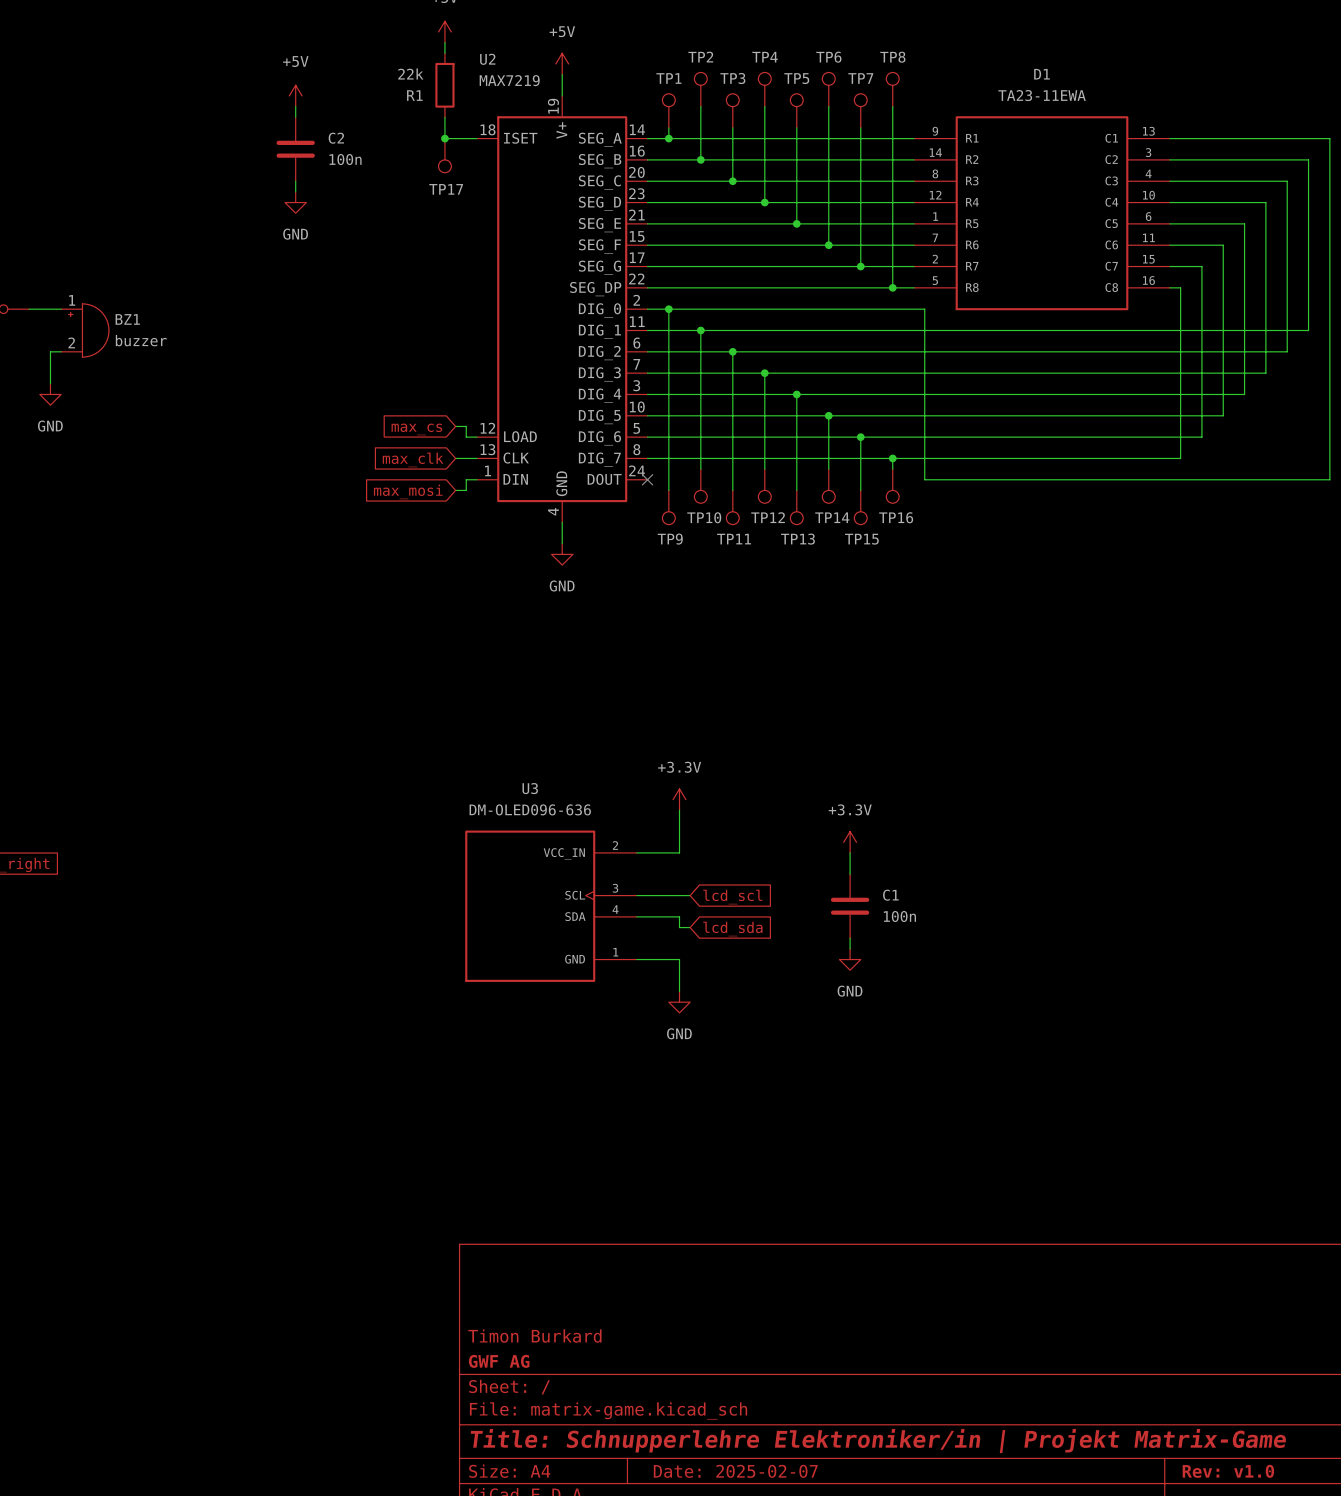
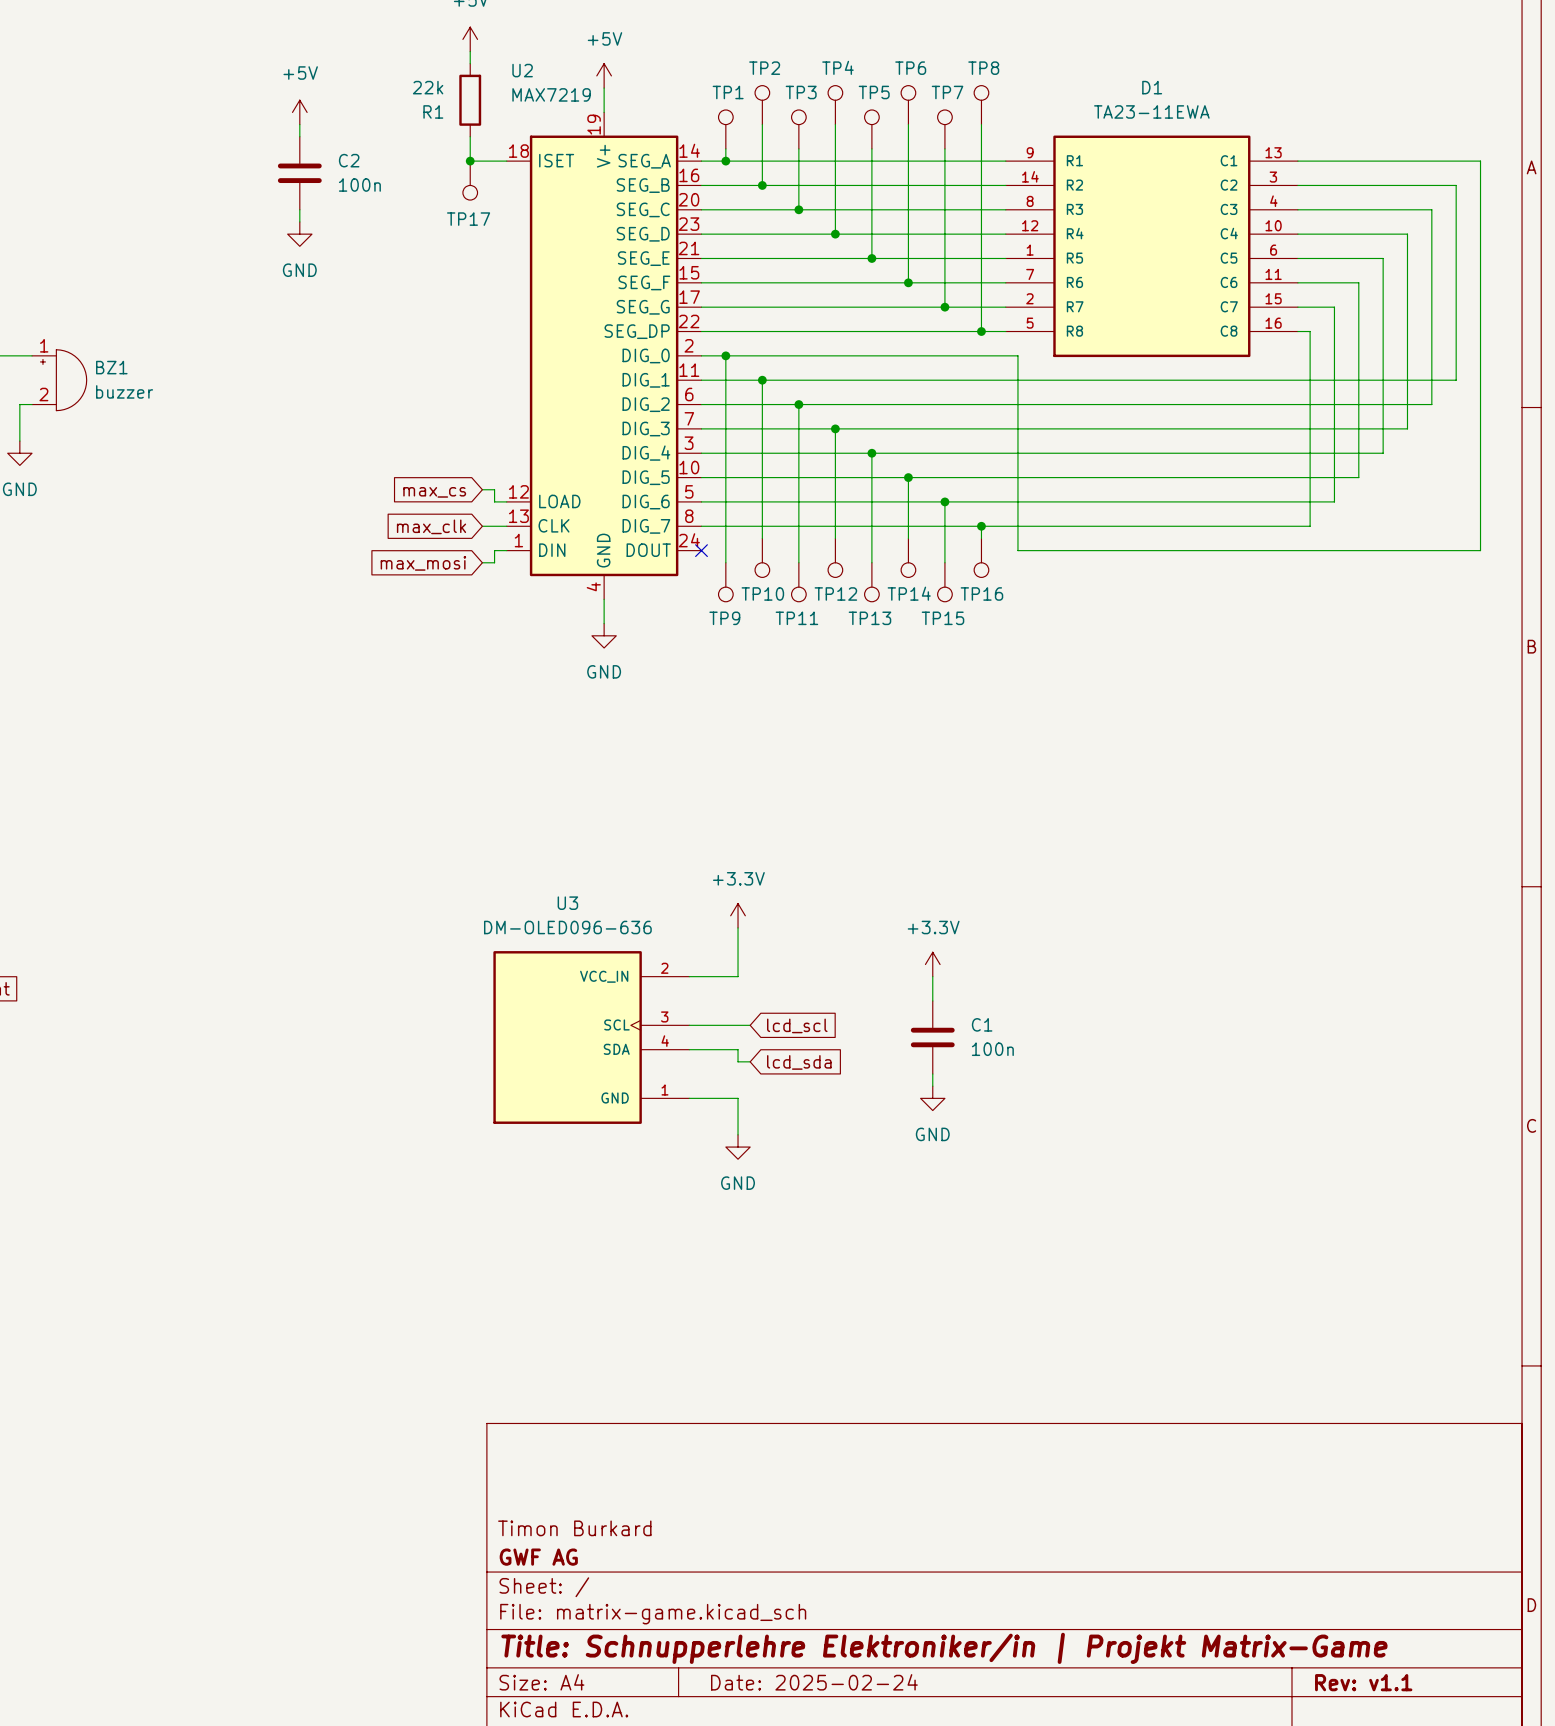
title block: Date: 2025-02-07 (735, 1471) -> Date: 2025-02-24 (814, 1682)
title block: Rev: v1.0 (1228, 1471) -> Rev: v1.1 (1363, 1682)

